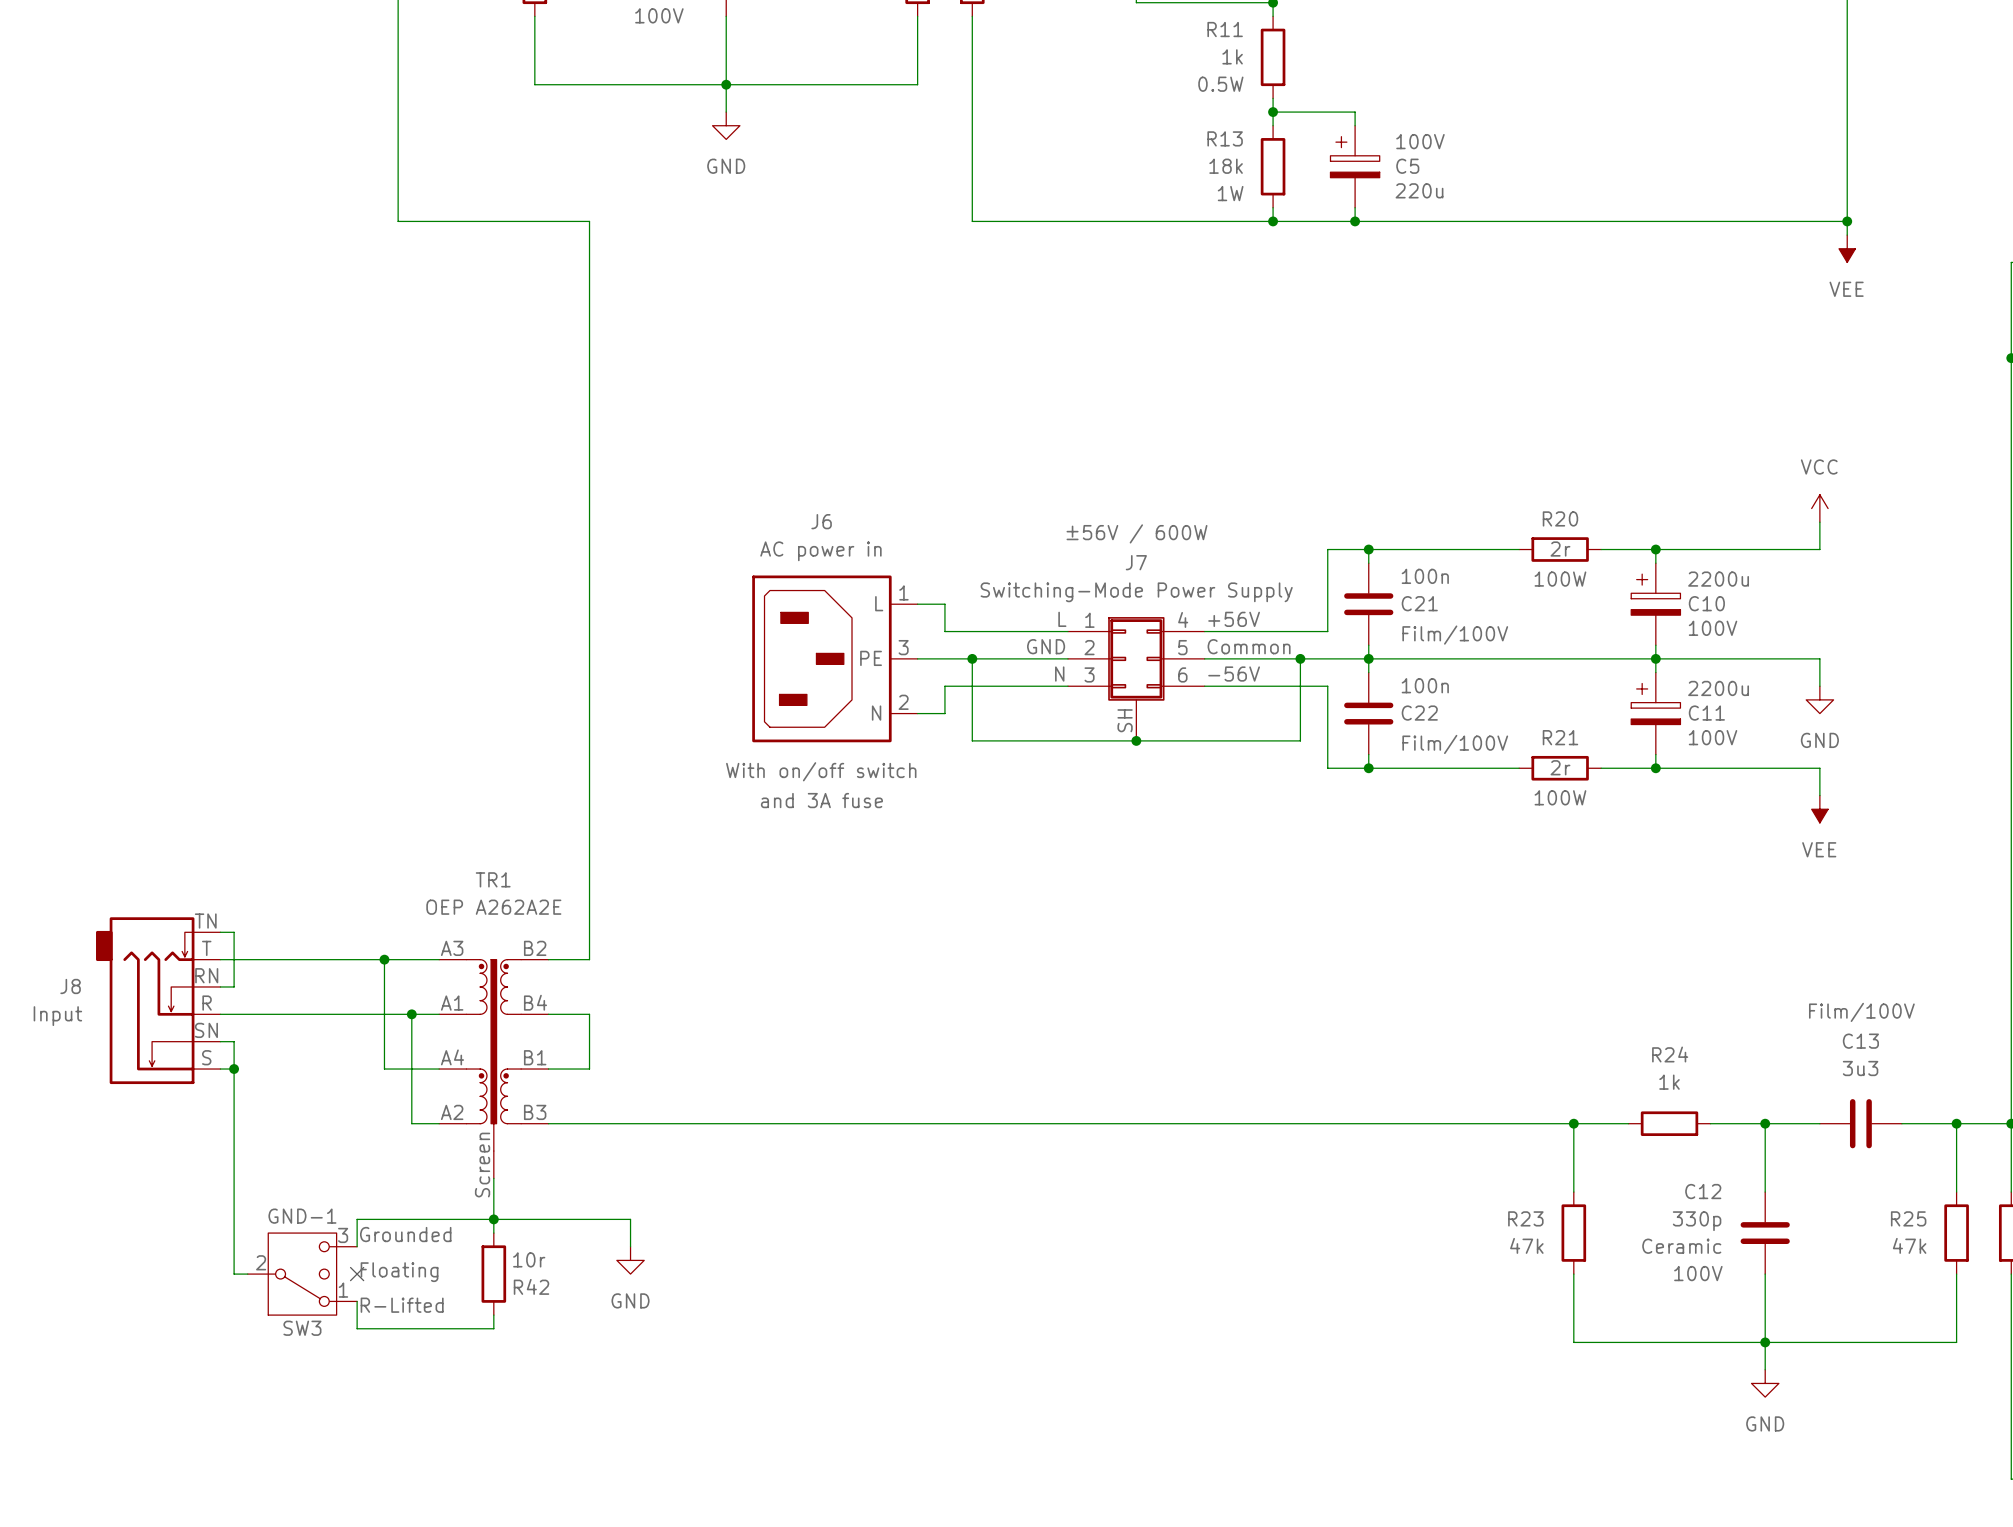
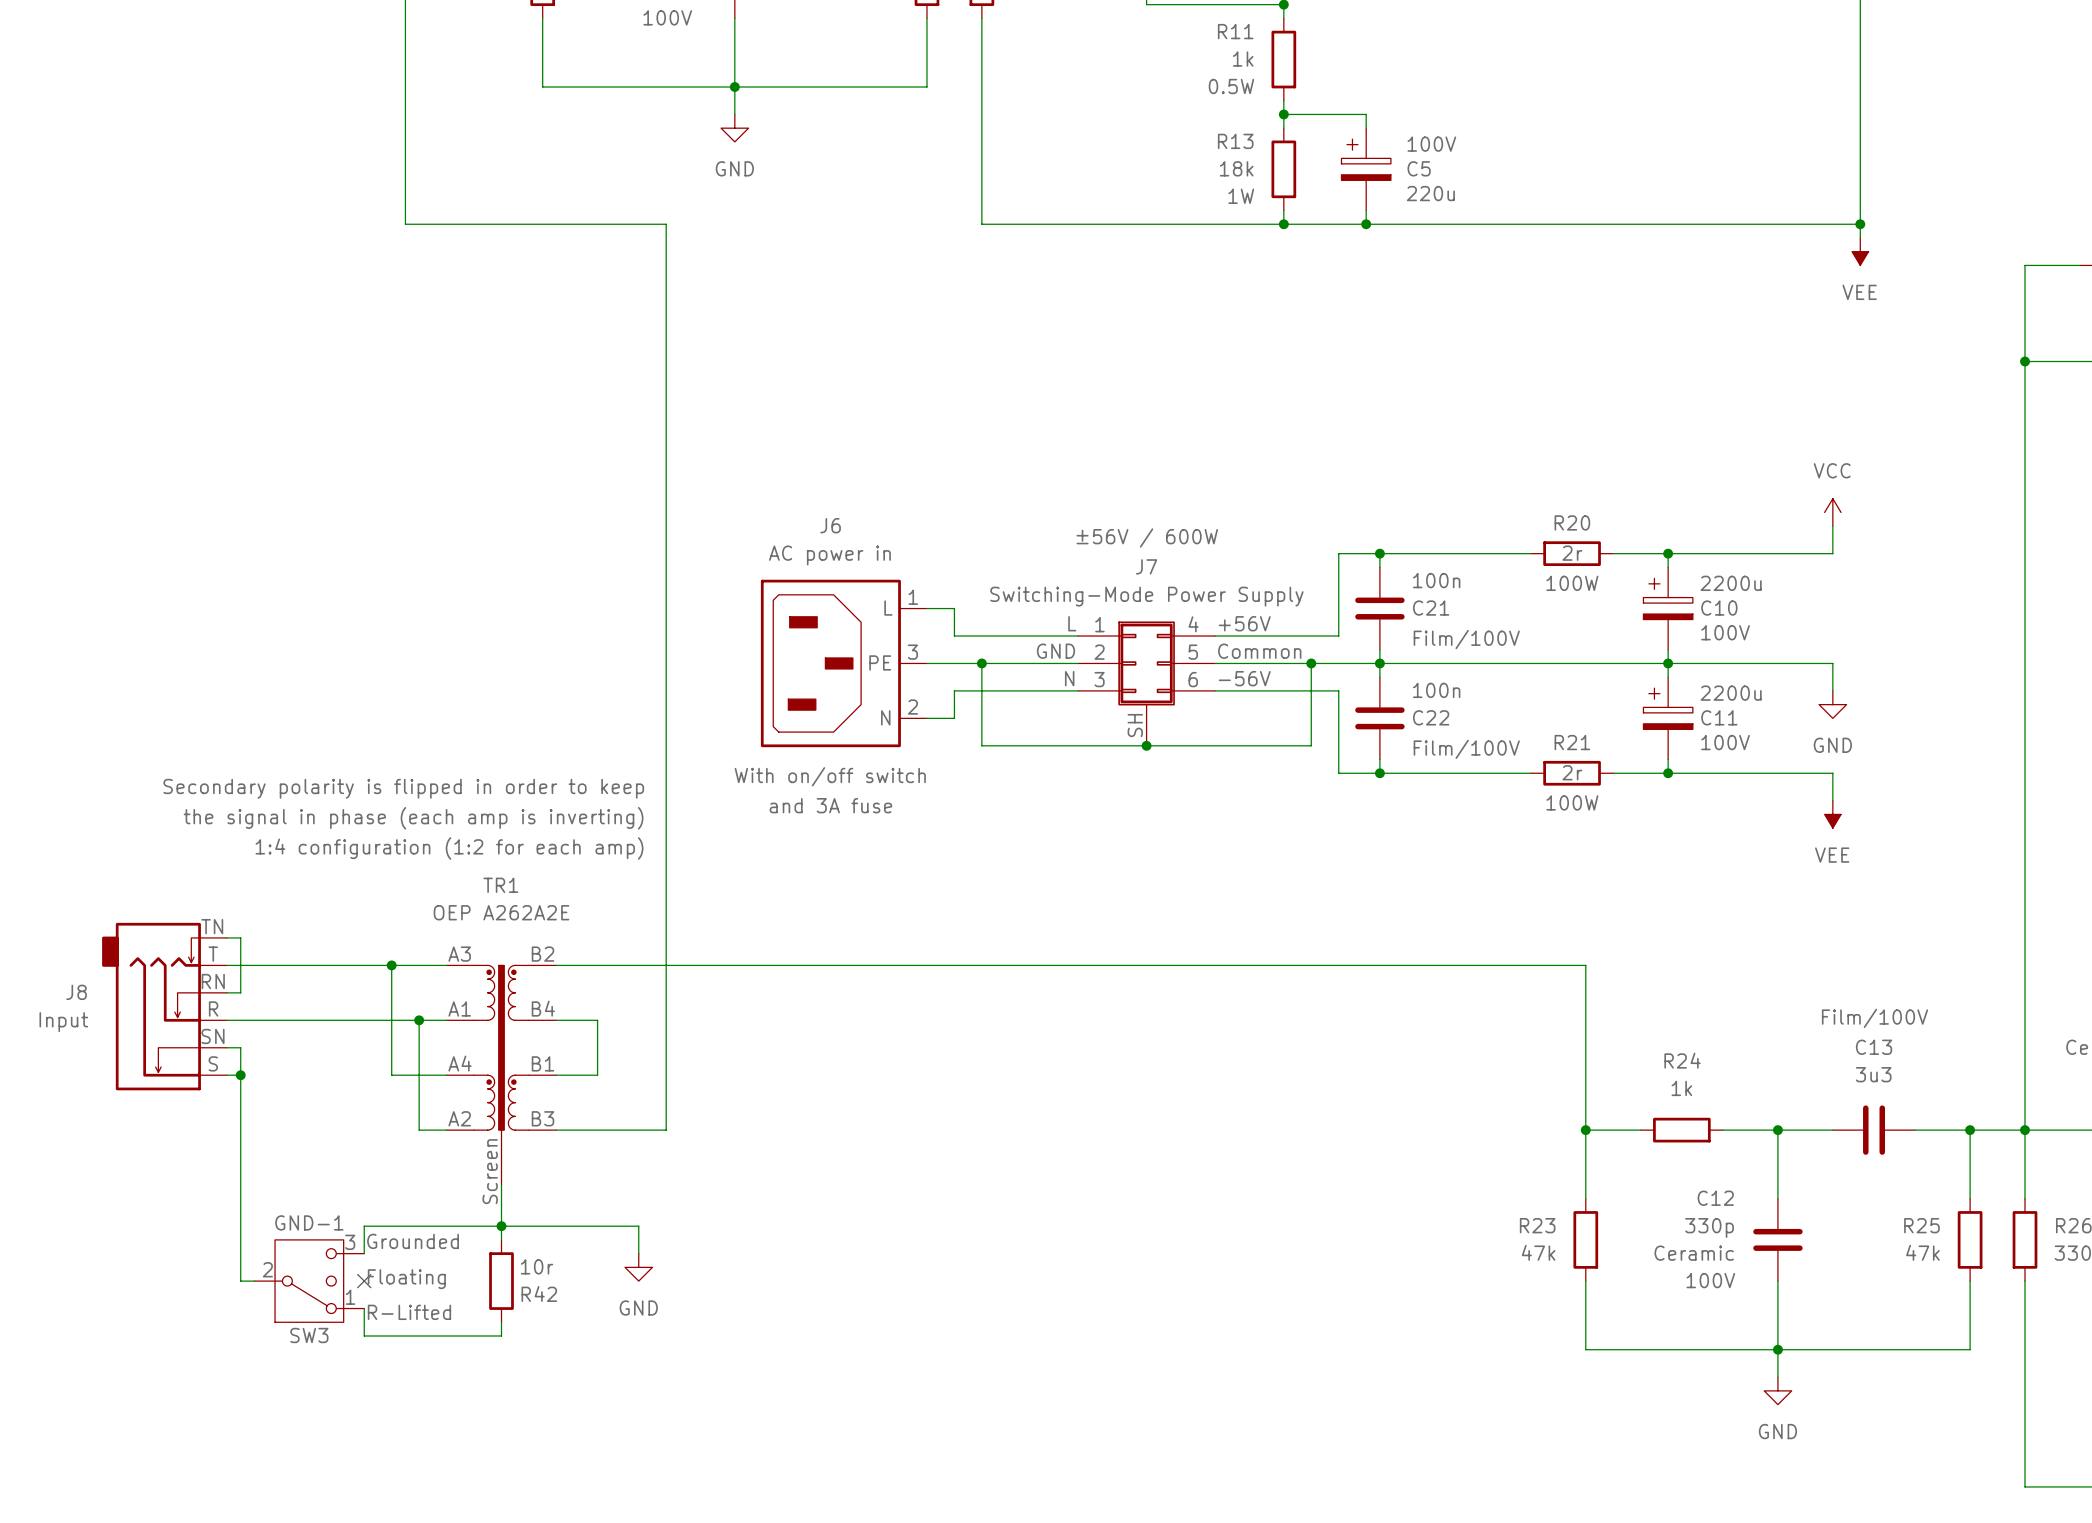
wire: (589, 221) (589, 959) -> (597, 224) (666, 224) (666, 1130)
TR1 text: none -> Secondary polarity is flipped in order to keep (403, 788)
TR1 text: none -> the signal in phase (each amp is inverting) (413, 818)
TR1 text: none -> 1:4 configuration (1:2 for each amp) (449, 848)
wire: (657, 1123) (1573, 1123) -> (597, 965) (1585, 965) (1585, 1130)

